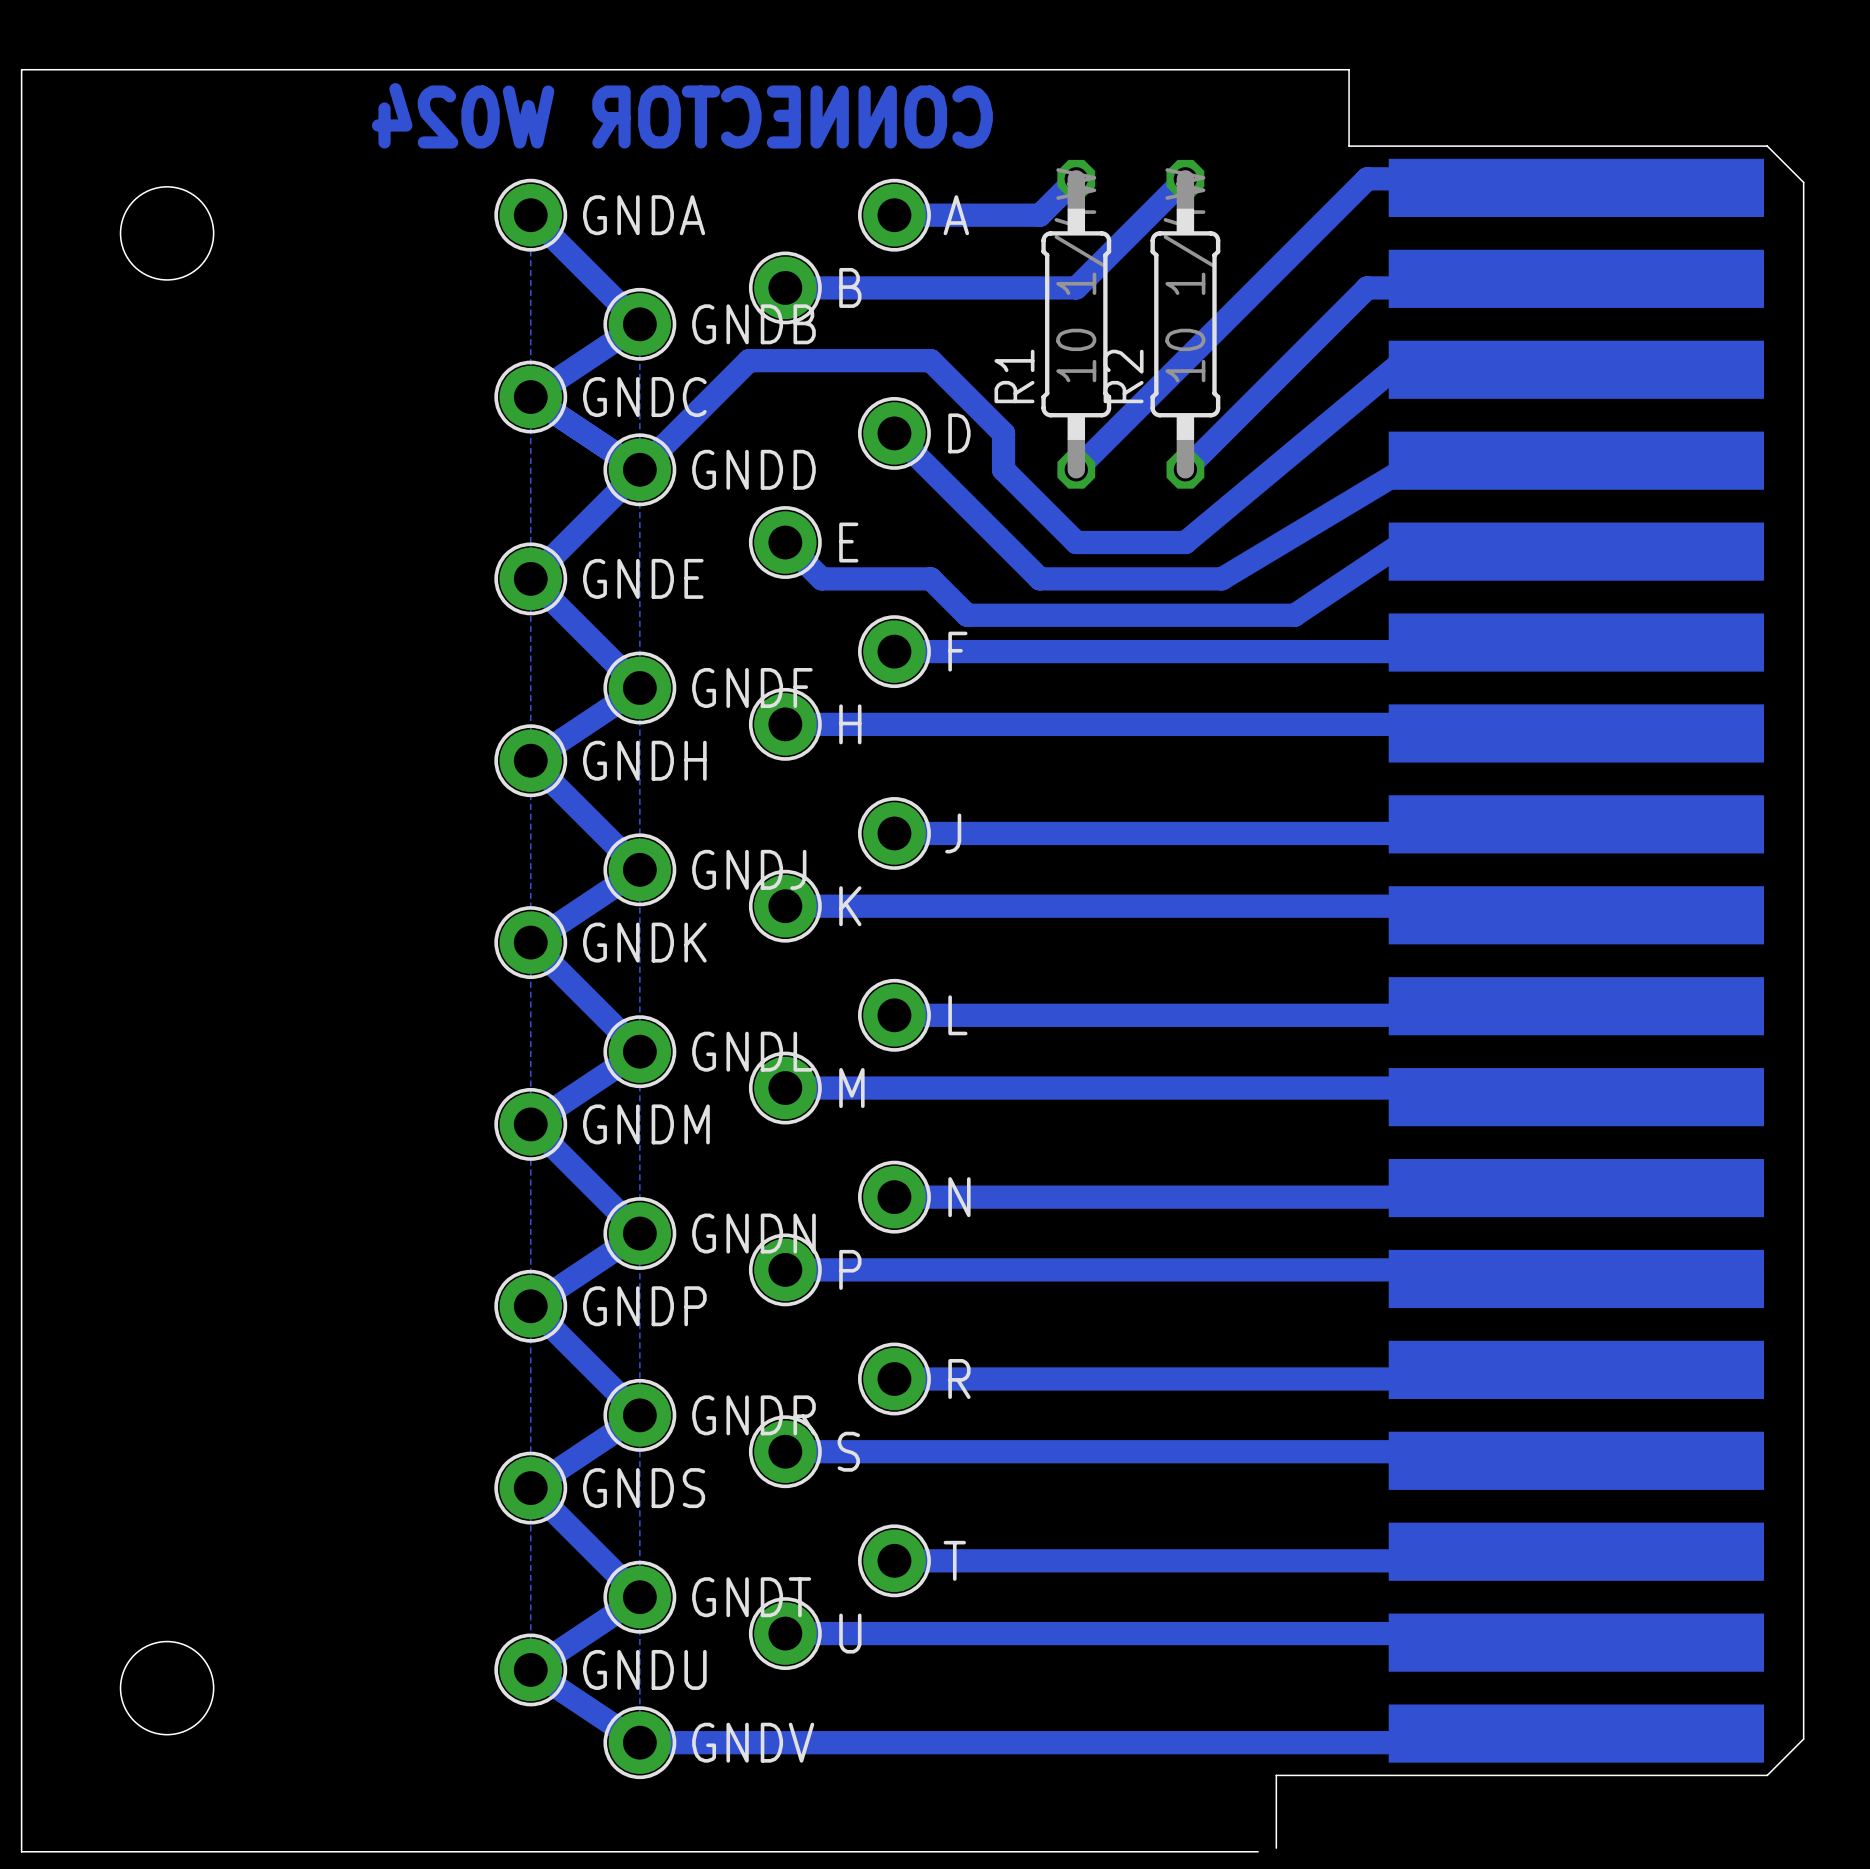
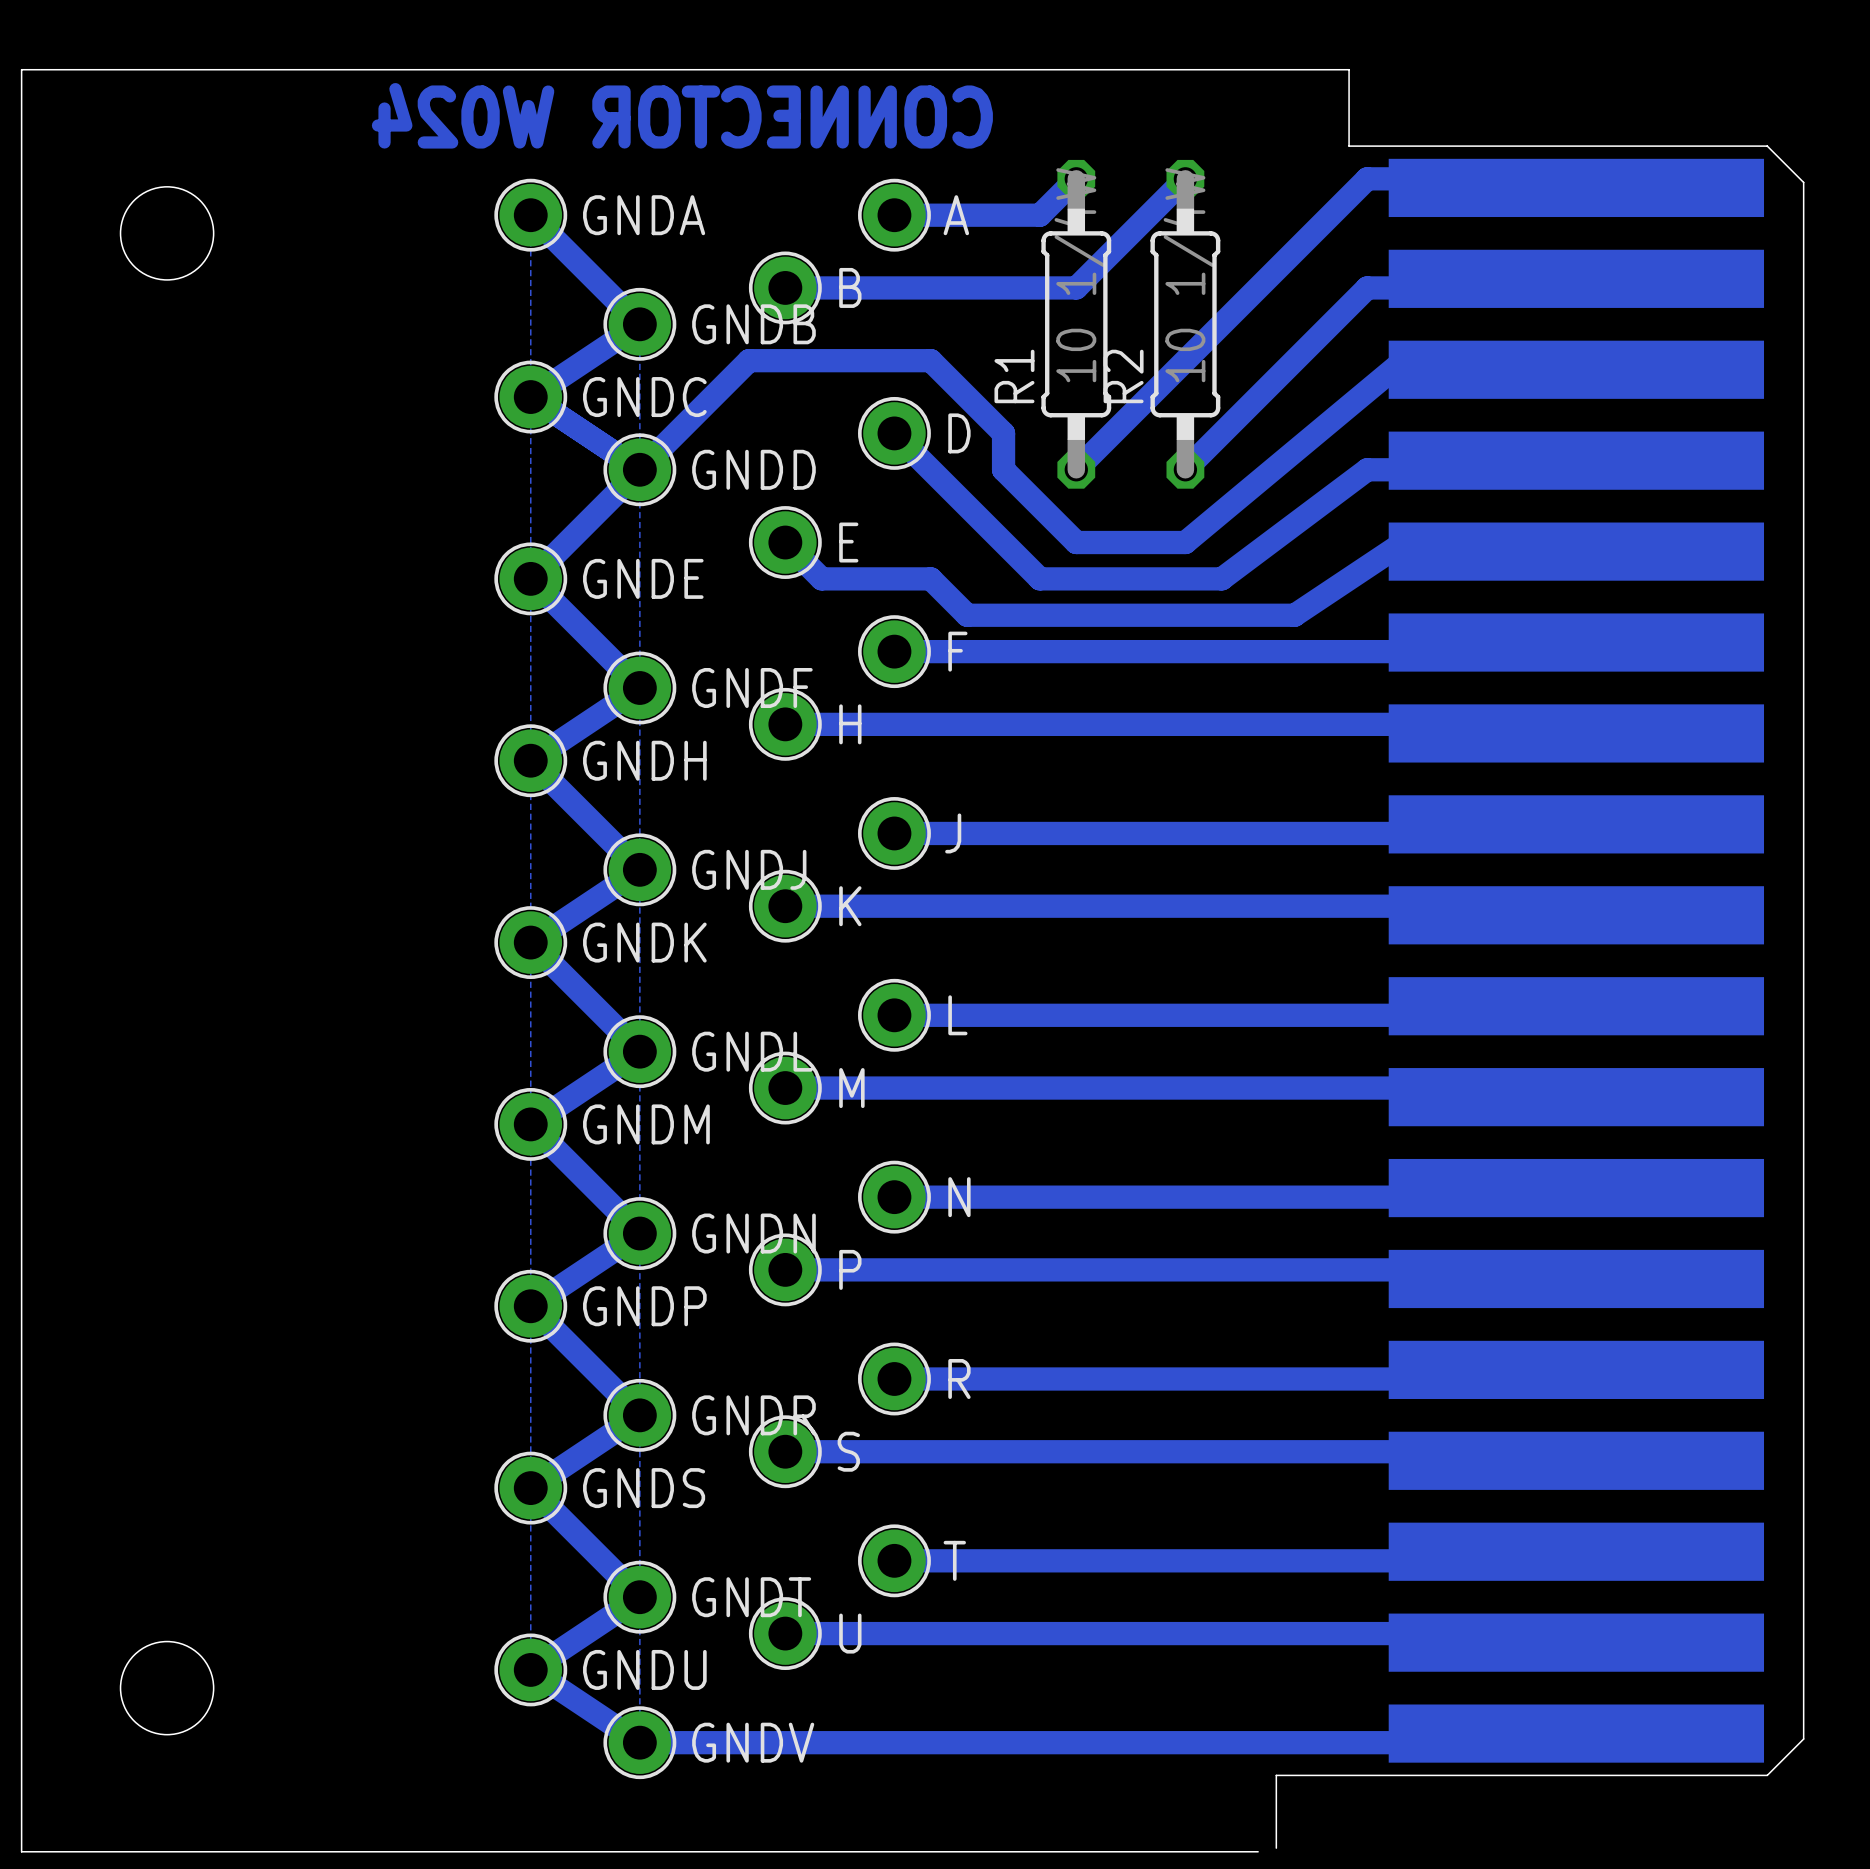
bottom track: (1403, 469) (1221, 578) -> (1403, 469) (1367, 469) (1221, 578)

